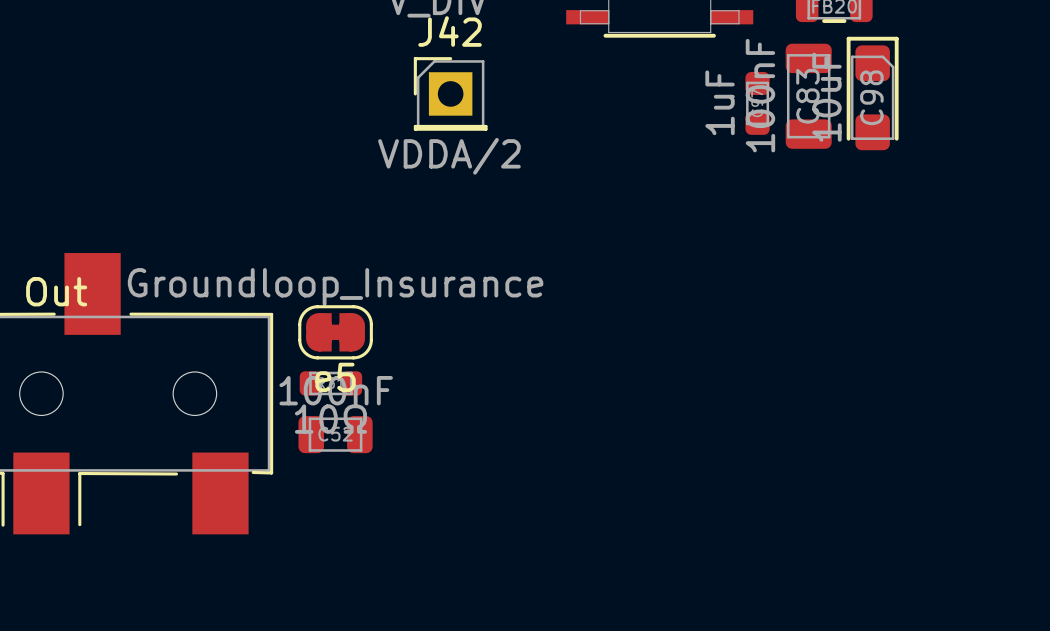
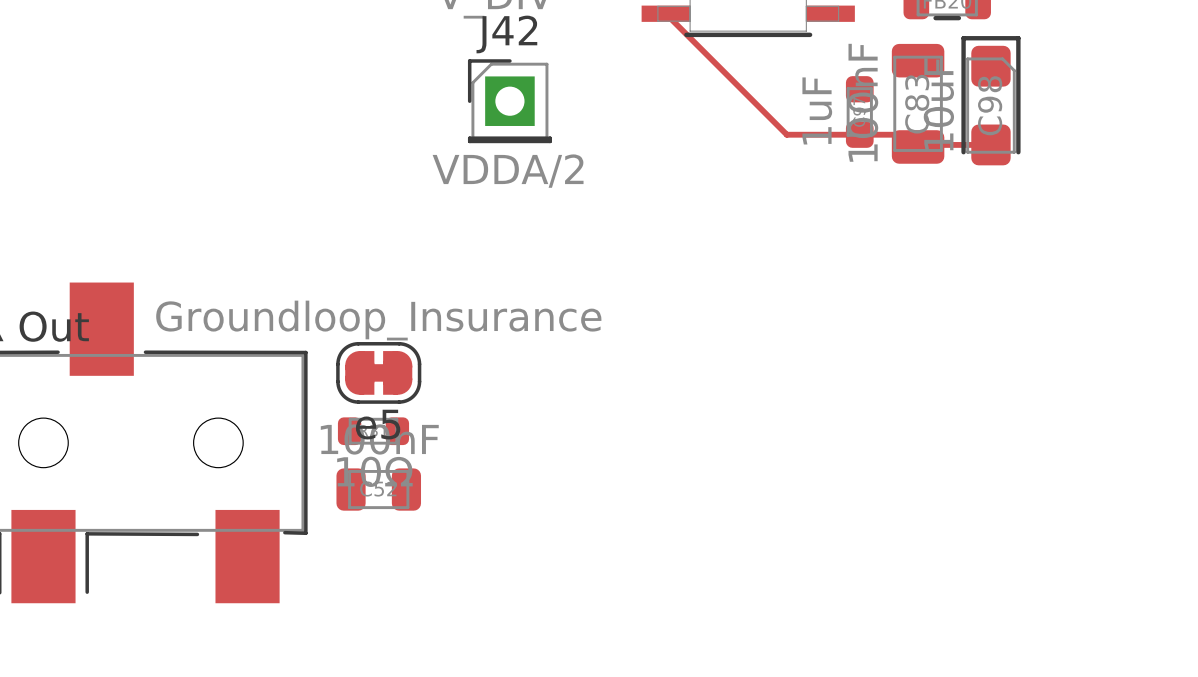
track: none -> (665, 13) (786, 134) (905, 134) (918, 146) (920, 144) (990, 144)

